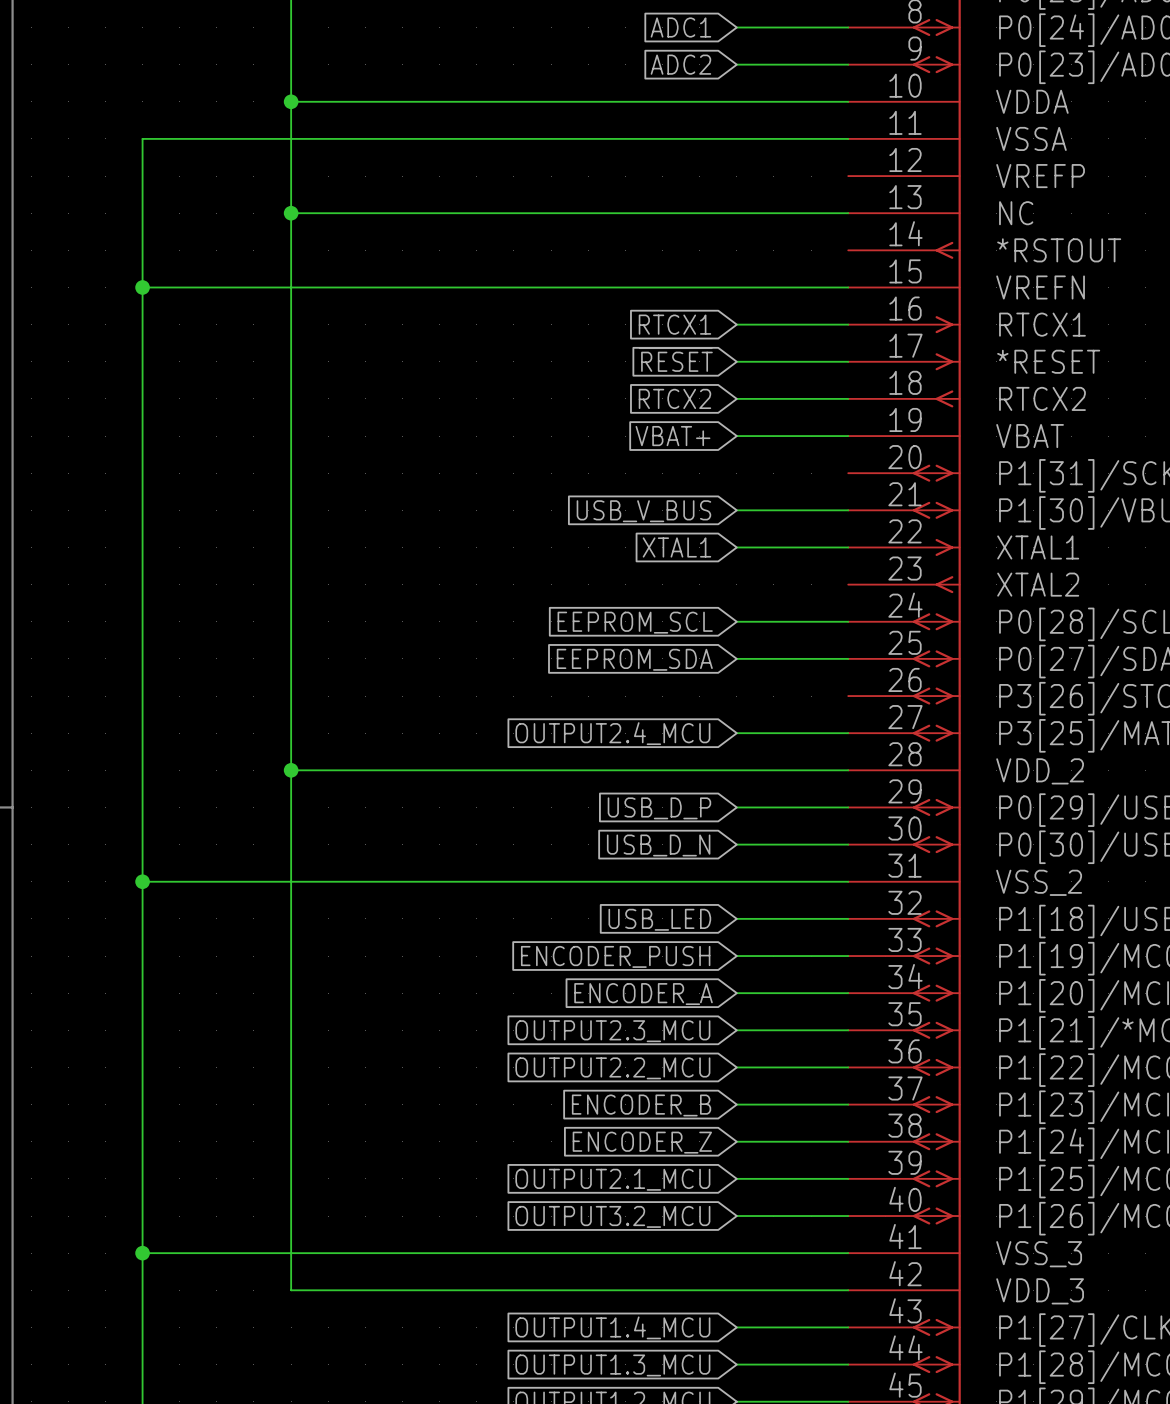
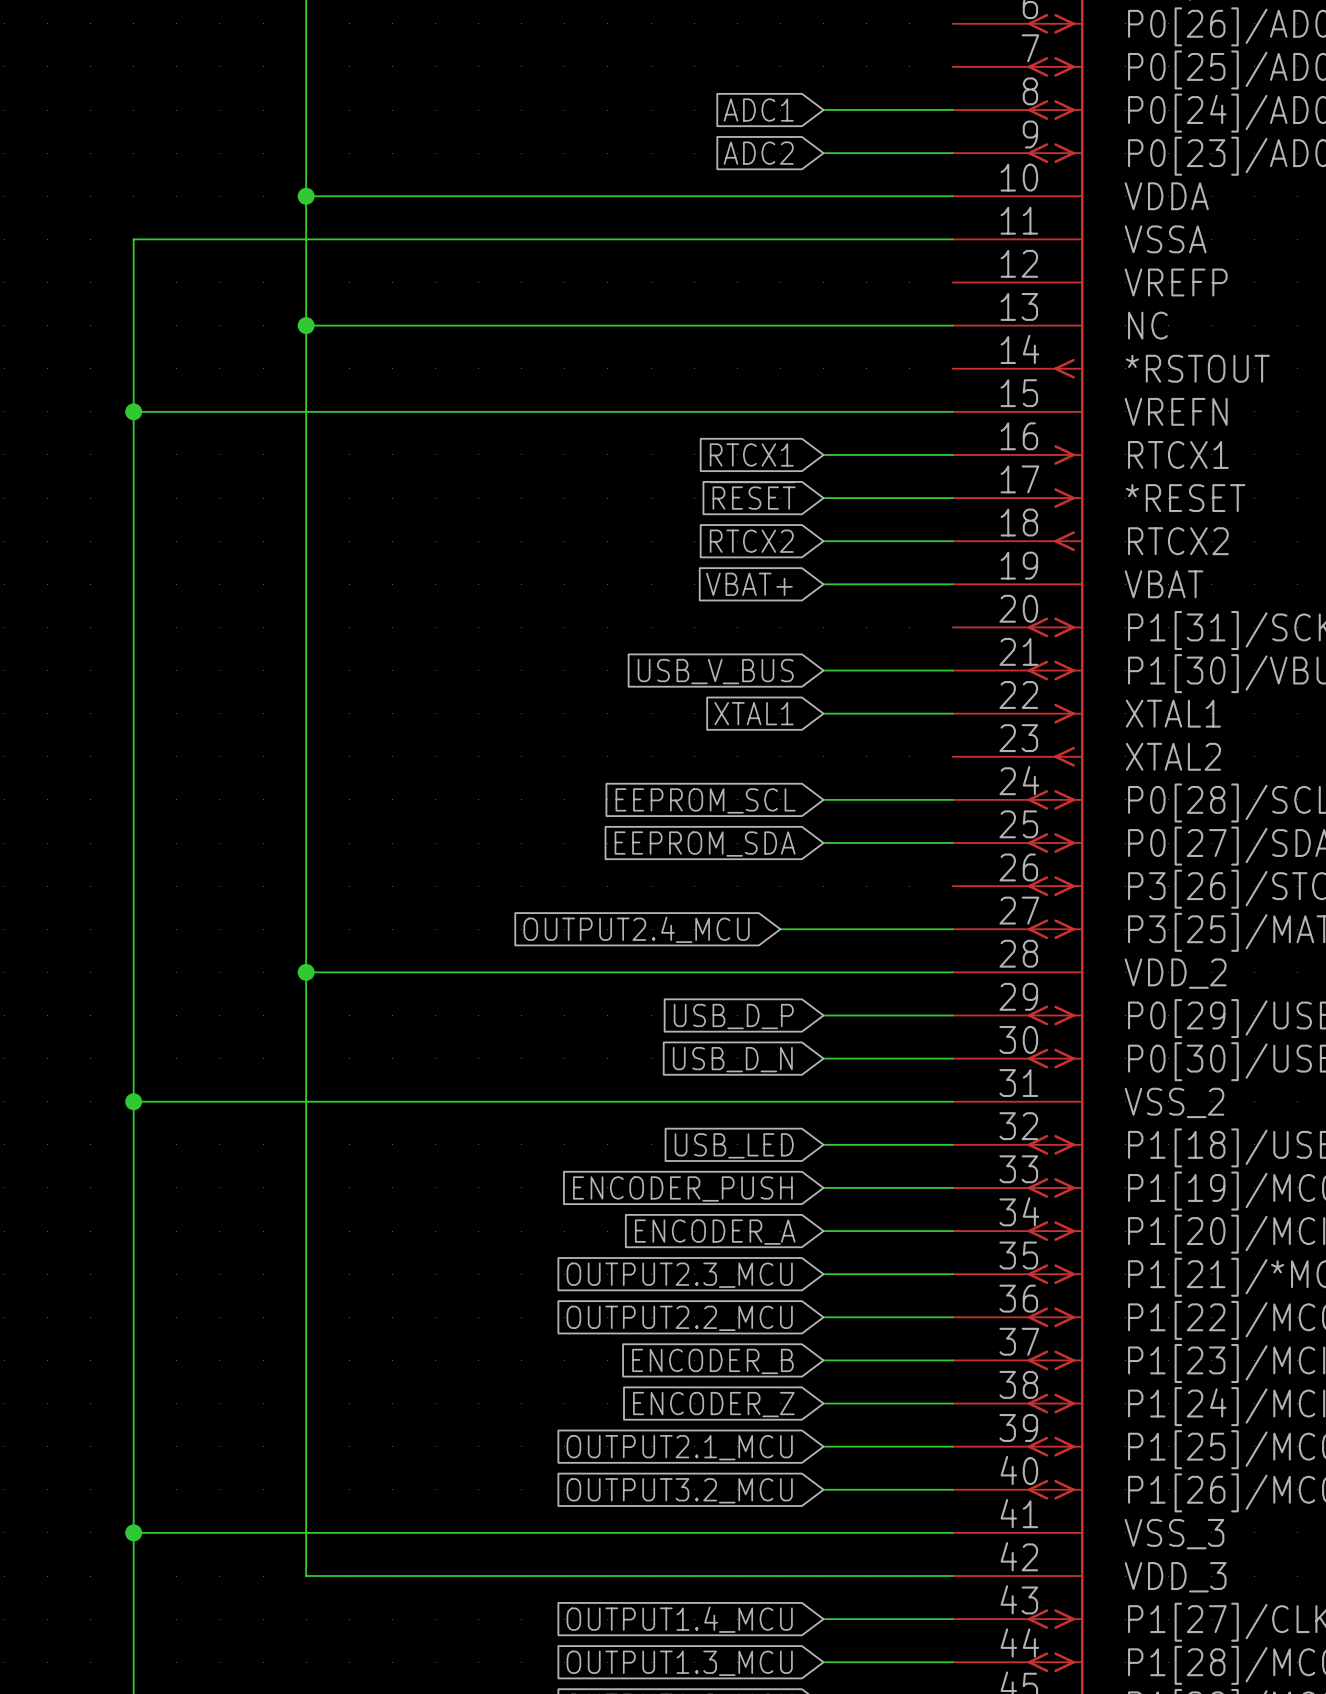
global label position: OUTPUT2.4_MCU (612, 733) -> OUTPUT2.4_MCU (636, 929)
wire: none -> (780, 929) (823, 929)

